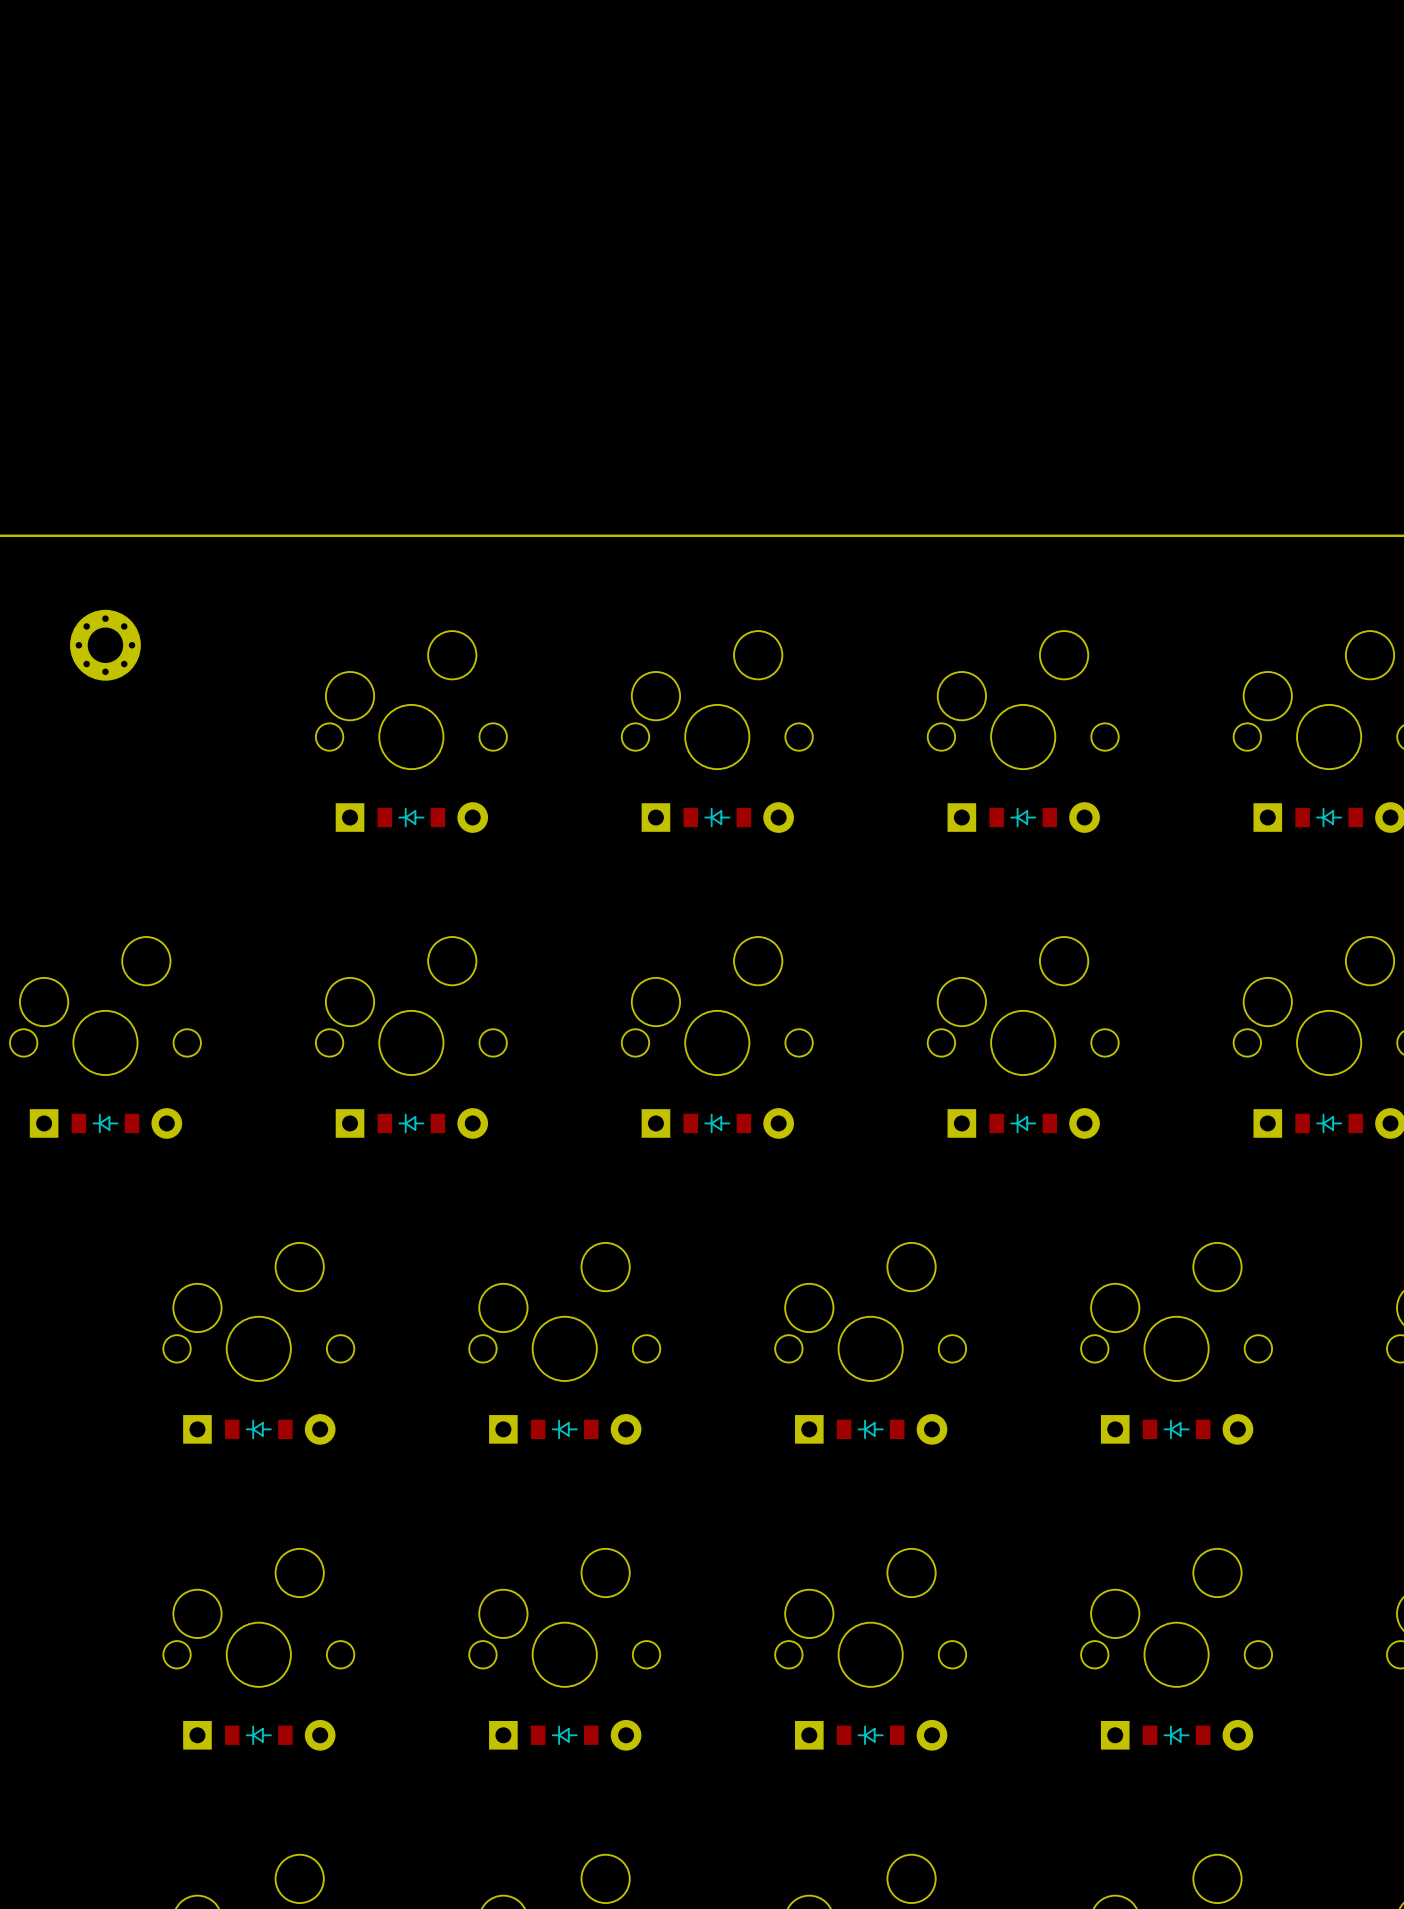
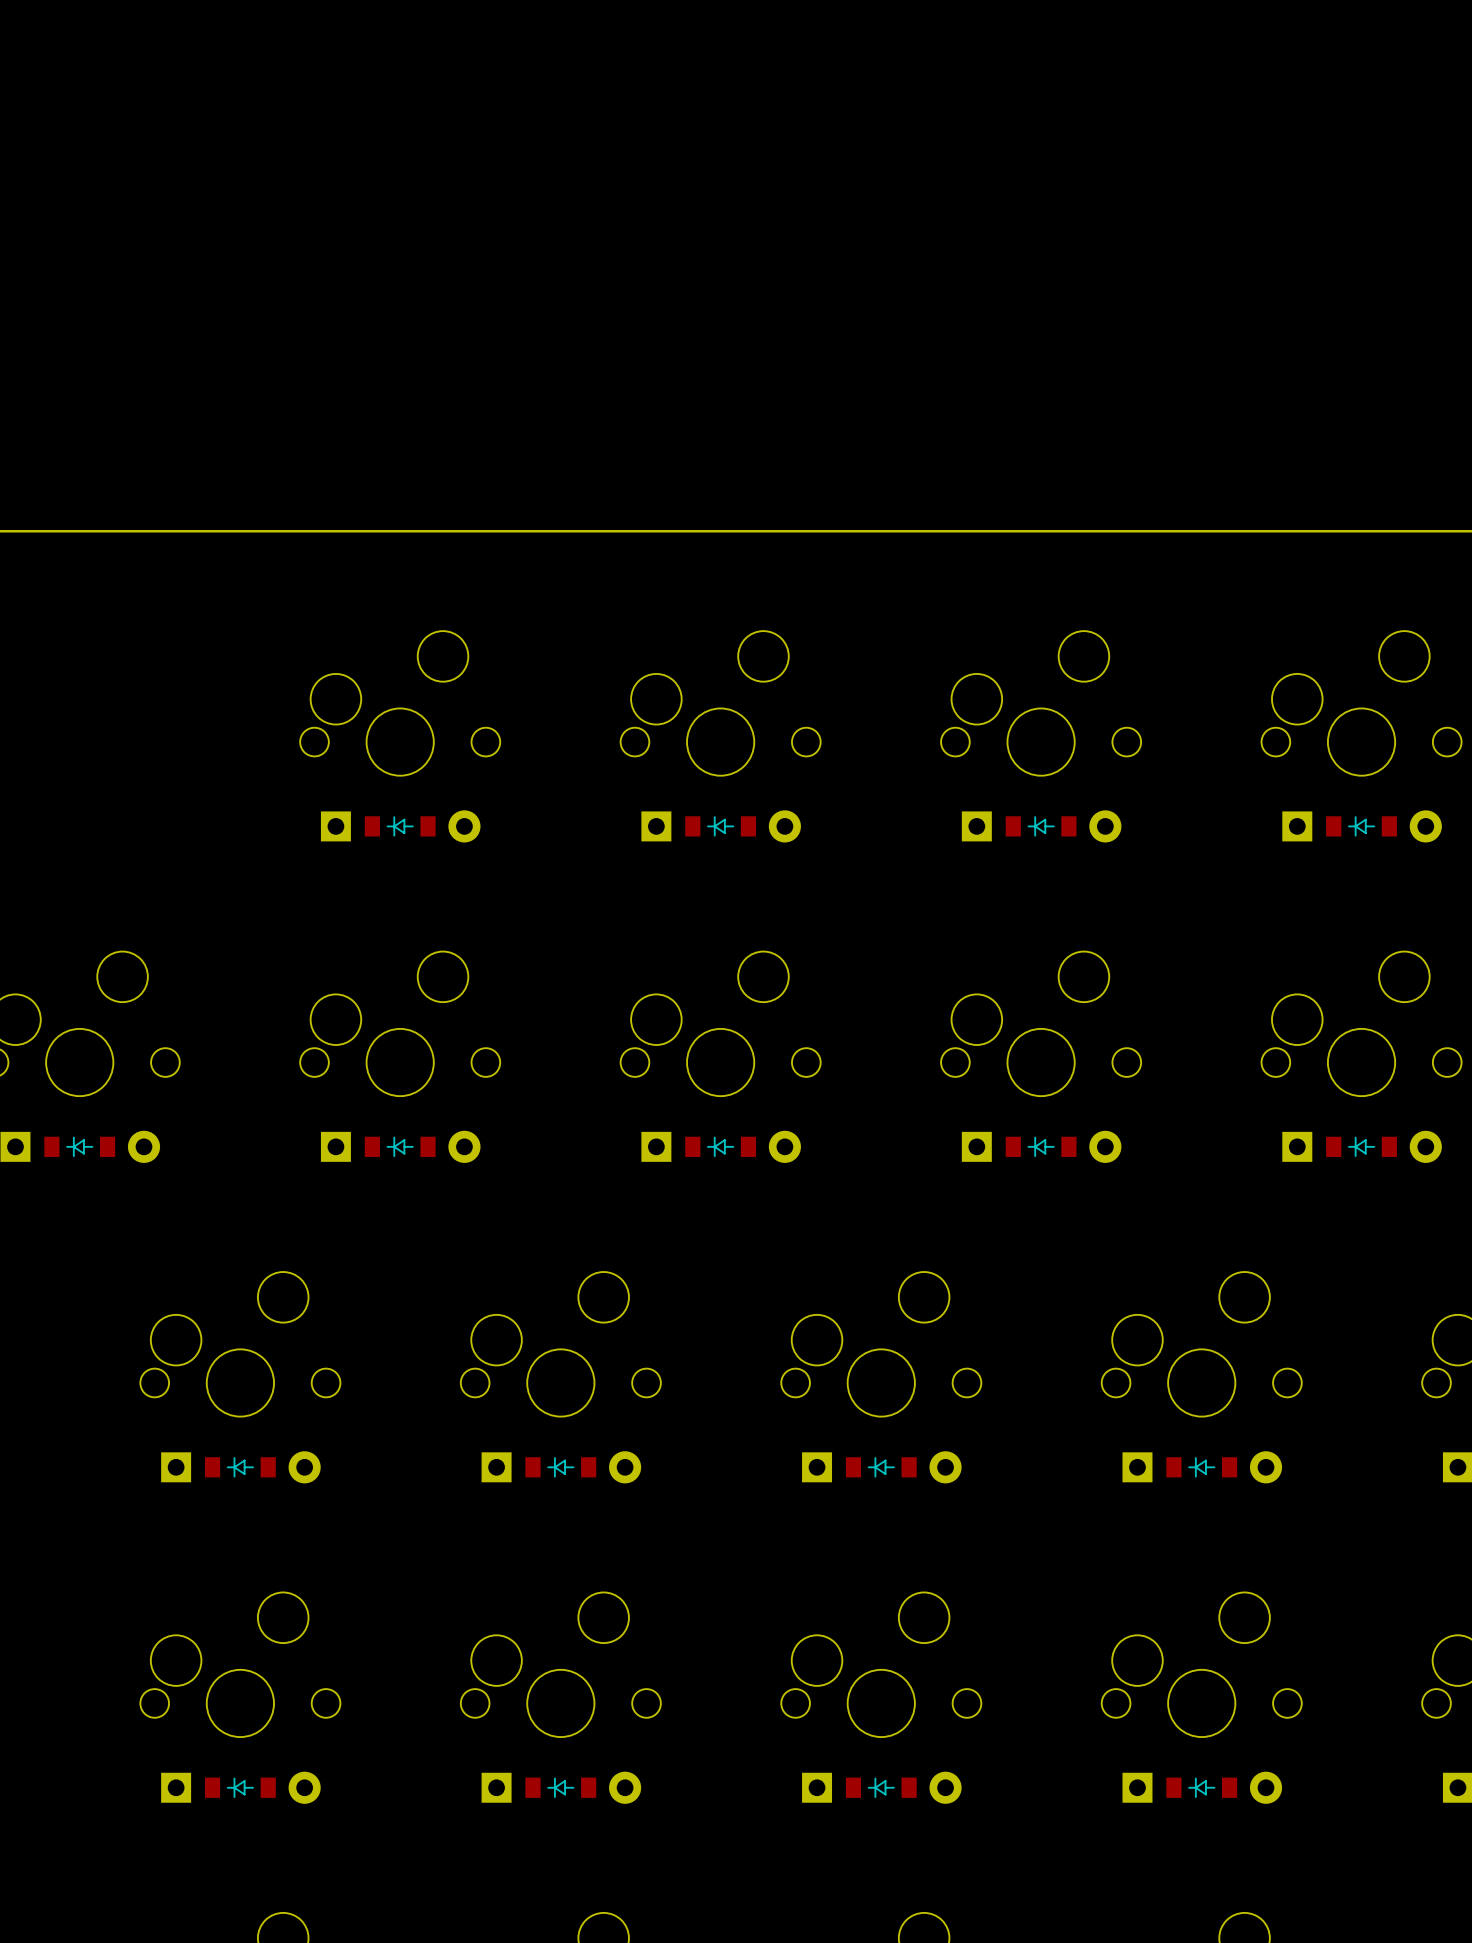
part: (105, 645) -> none

